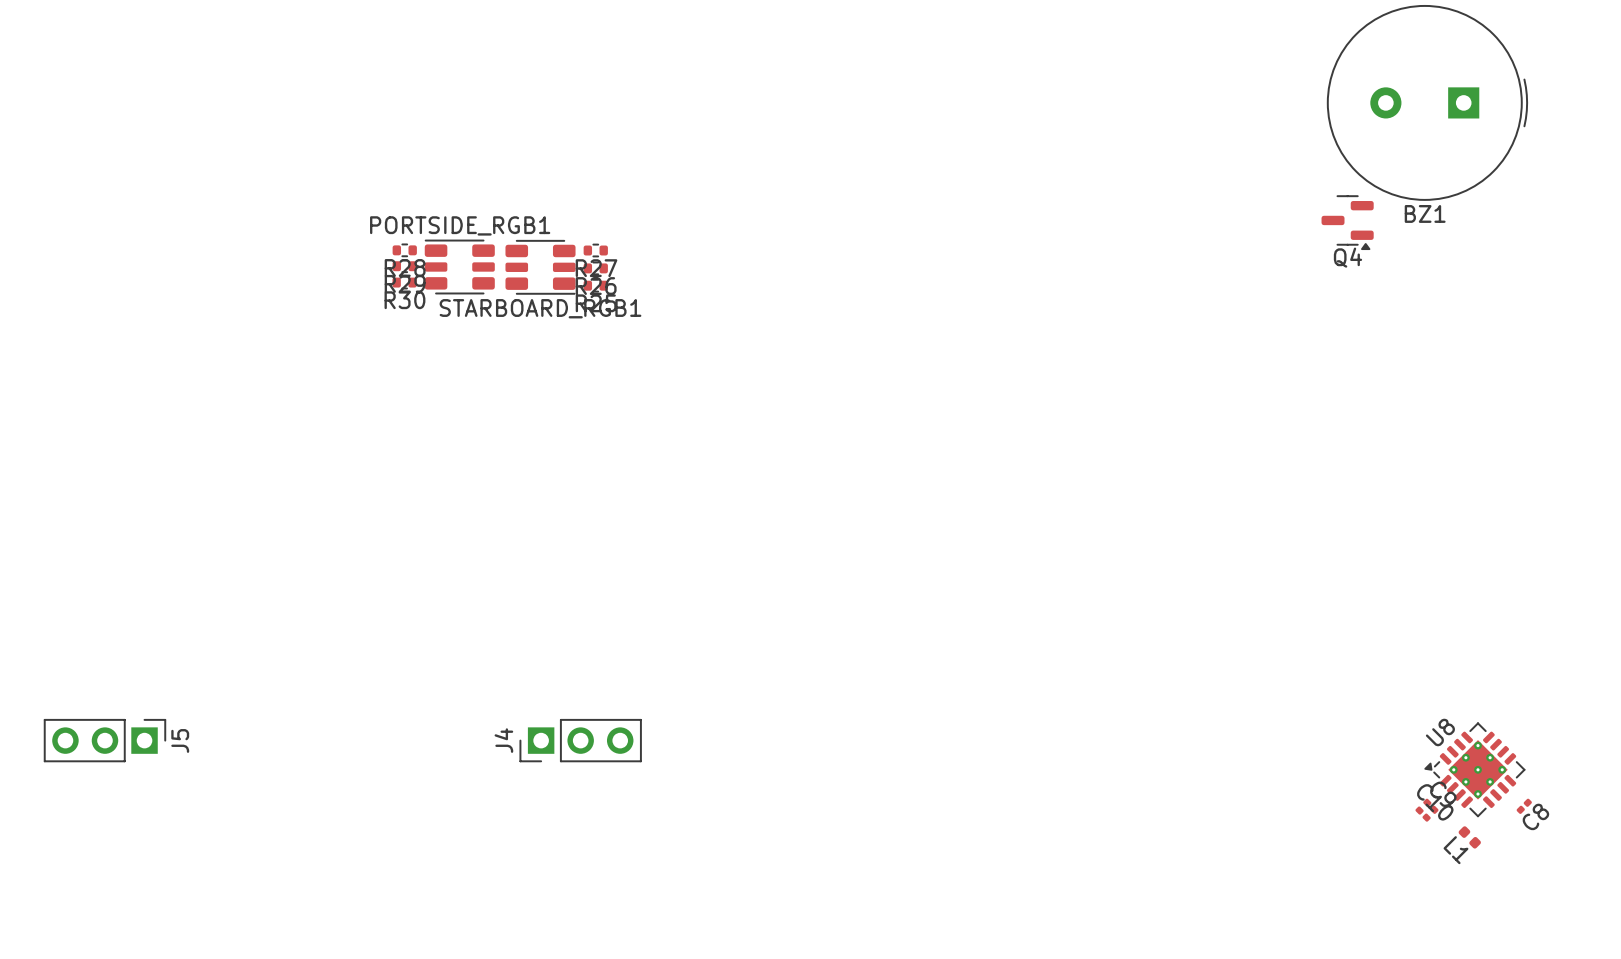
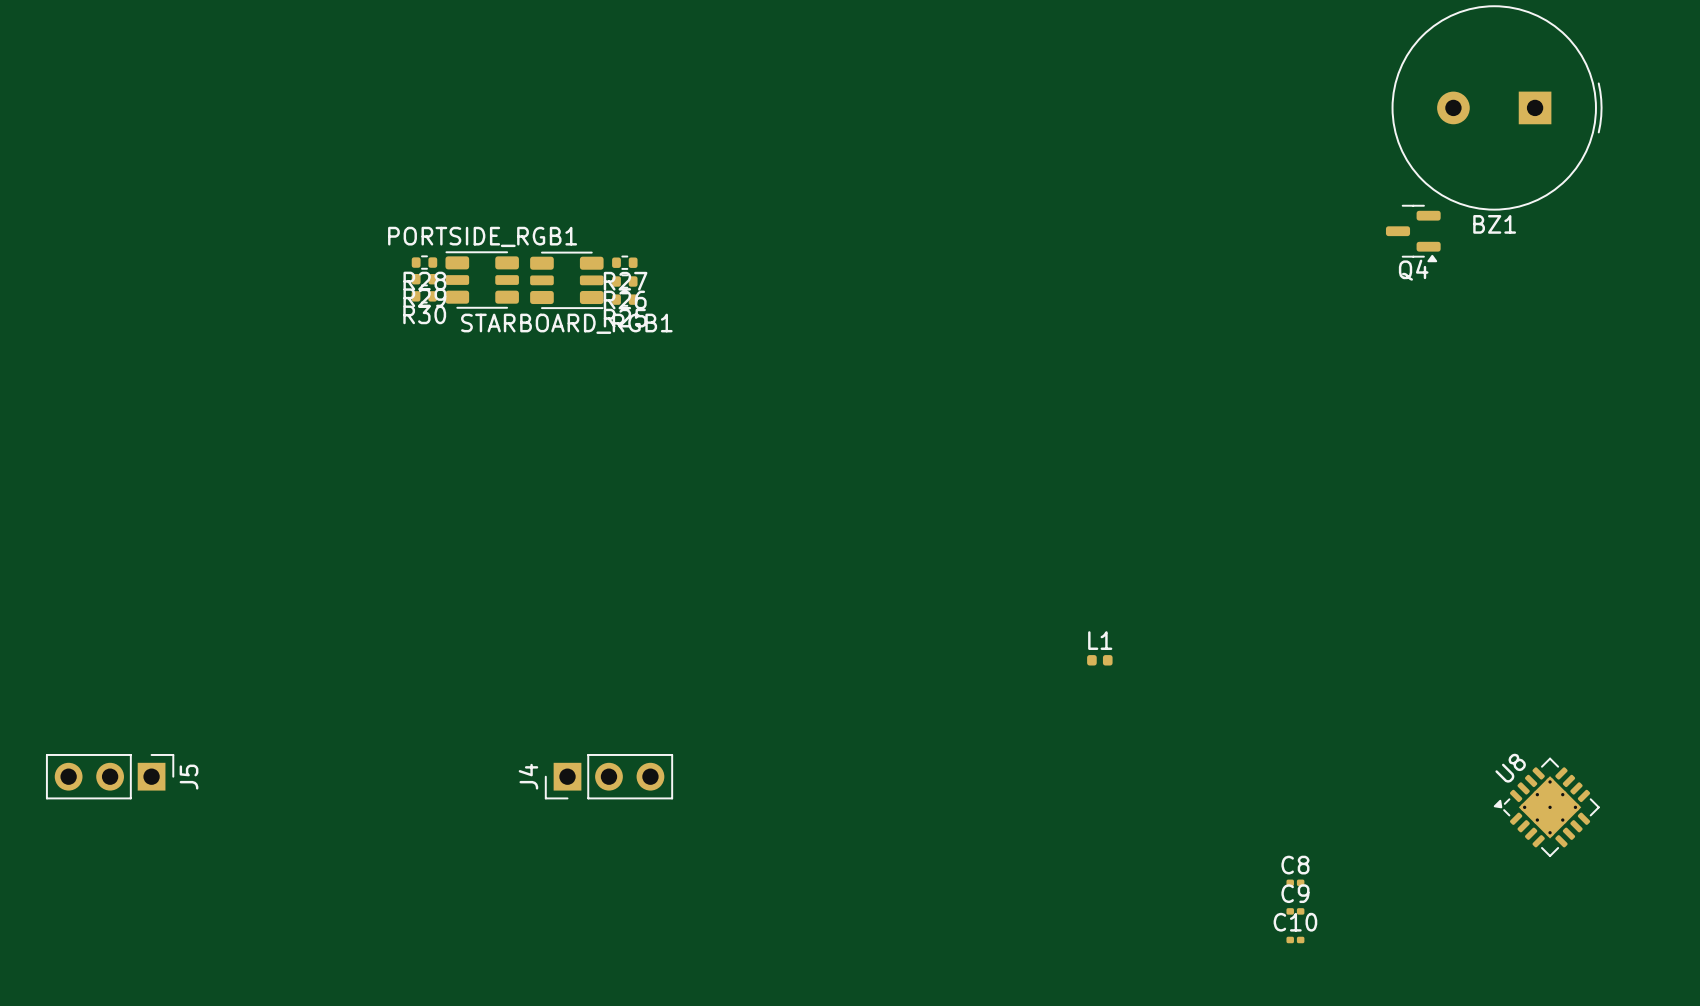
C9 rotation: 0° (1430, 806) -> 45° counterclockwise (1295, 911)
C9 position: (1430, 806) -> (1295, 911)
C8 rotation: 0° (1524, 806) -> 45° clockwise (1295, 882)
C8 position: (1524, 806) -> (1295, 882)
C10 rotation: 0° (1423, 814) -> 45° counterclockwise (1295, 939)
C10 position: (1423, 814) -> (1295, 939)
L1 rotation: 0° (1469, 837) -> 45° counterclockwise (1099, 660)
L1 position: (1469, 837) -> (1099, 660)
L1 name position: L1 (1455, 850) -> L1 (1100, 640)

